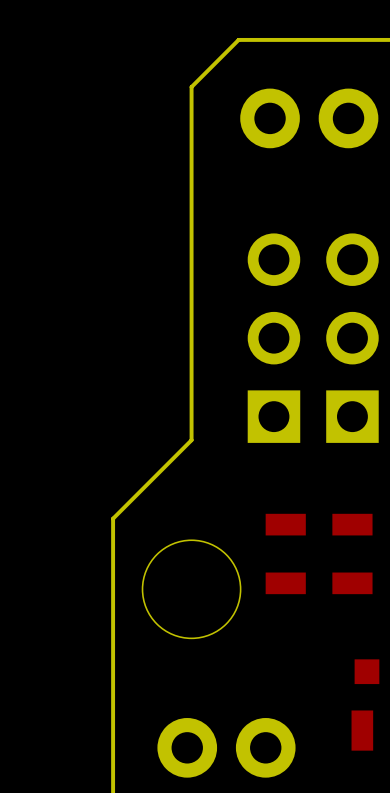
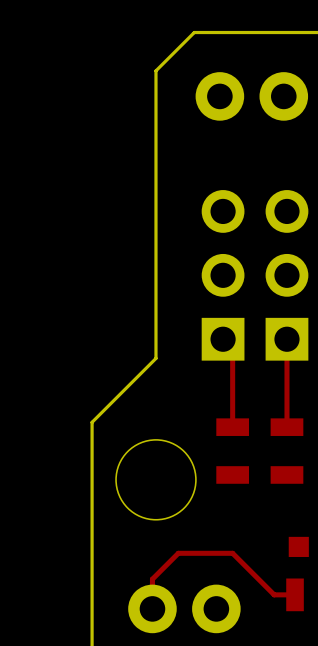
top track: none -> (223, 339) (232, 348) (232, 427)
top track: none -> (286, 339) (286, 427)
top track: none -> (295, 594) (274, 594) (232, 553) (178, 553) (152, 579) (152, 608)

